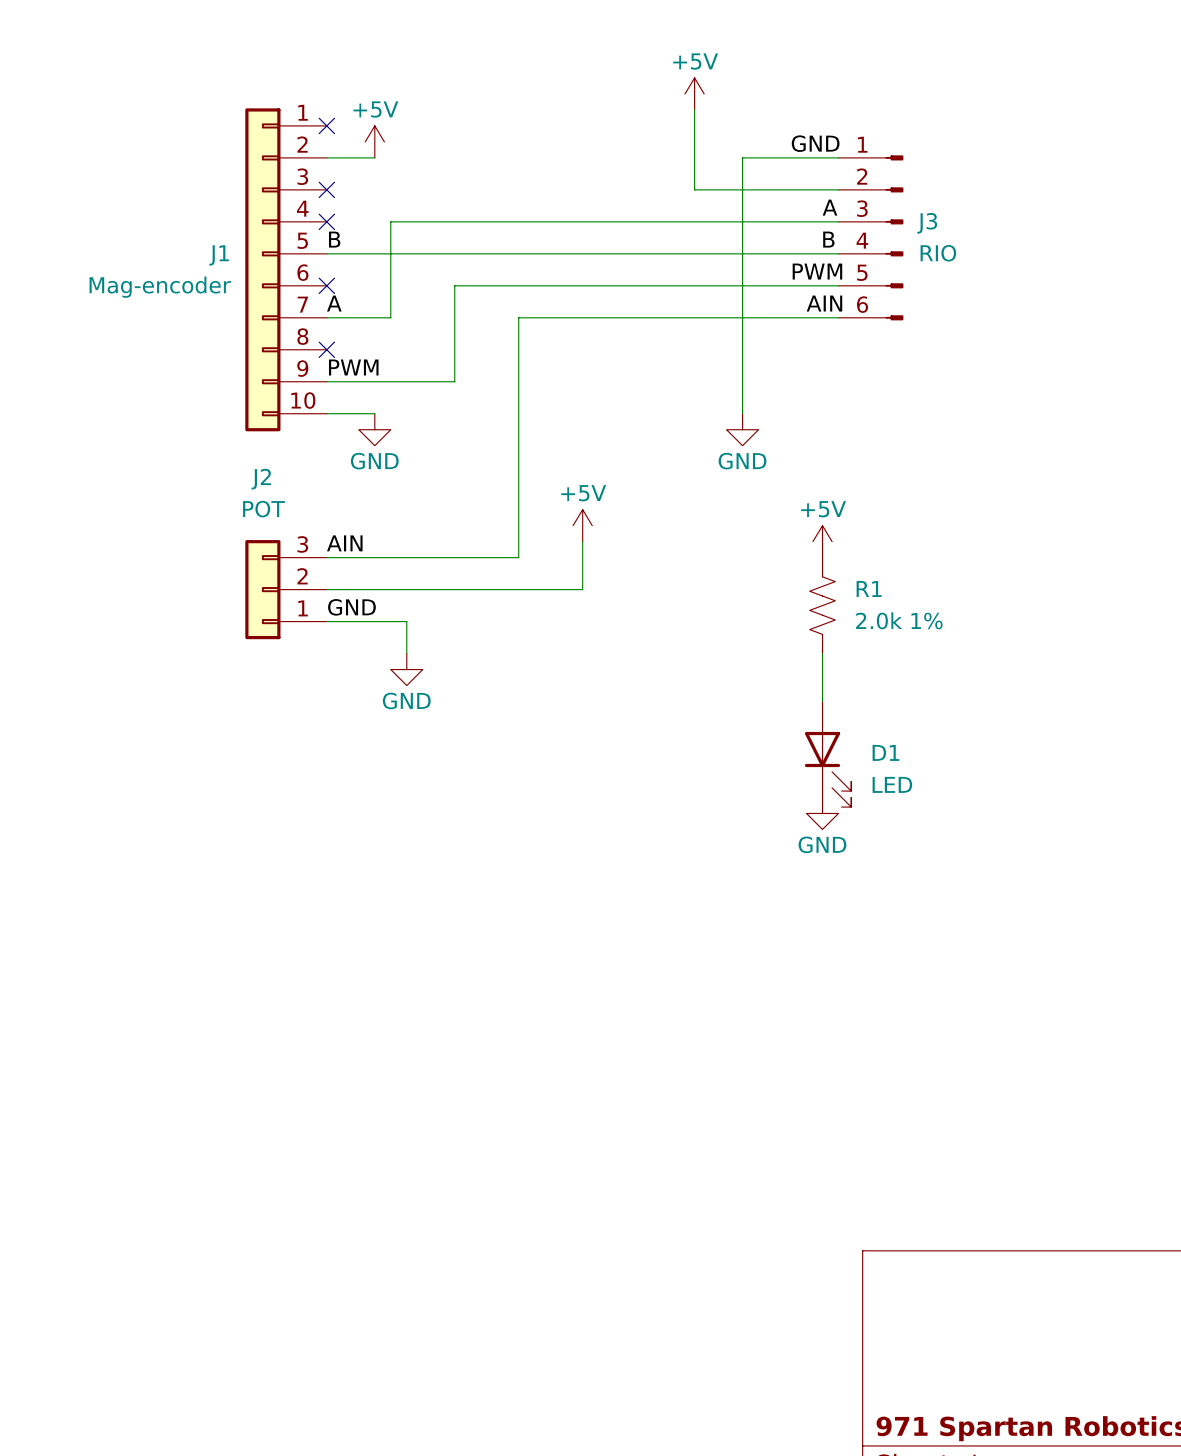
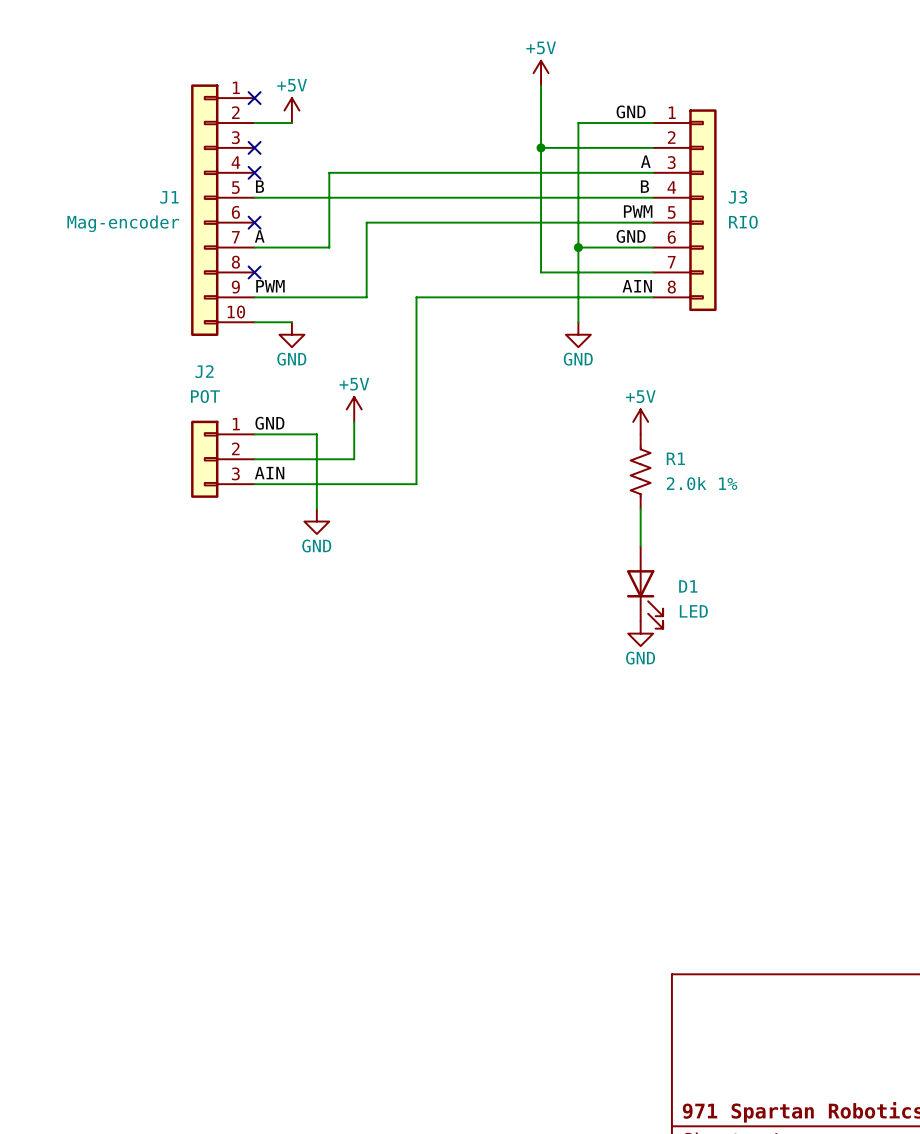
J3 symbol: [838, 155, 904, 321] -> [653, 109, 717, 312]
wire: none -> (541, 147) (541, 272) (653, 272)
junction: none -> (541, 147)
wire: (422, 221) (390, 221) (390, 317) -> (329, 172) (329, 247) (304, 247)
label position: PWM (817, 271) -> PWM (638, 211)
wire: (470, 285) (454, 285) (454, 381) -> (366, 222) (366, 297) (354, 297)
label: none -> GND (631, 236)
label position: AIN (824, 303) -> AIN (637, 286)
wire: (742, 317) (518, 317) (518, 557) (406, 557) -> (653, 297) (416, 297) (416, 484) (316, 484) (316, 434)
junction: none -> (578, 247)
power symbol position: +5V (582, 525) -> +5V (354, 409)
wire: (582, 541) (582, 589) (454, 589) -> (354, 421) (354, 459)
label: AIN (344, 543) -> GND (269, 423)
J2 flip: as is (262, 589) -> up-down (204, 459)
label: GND (351, 607) -> AIN (269, 473)

